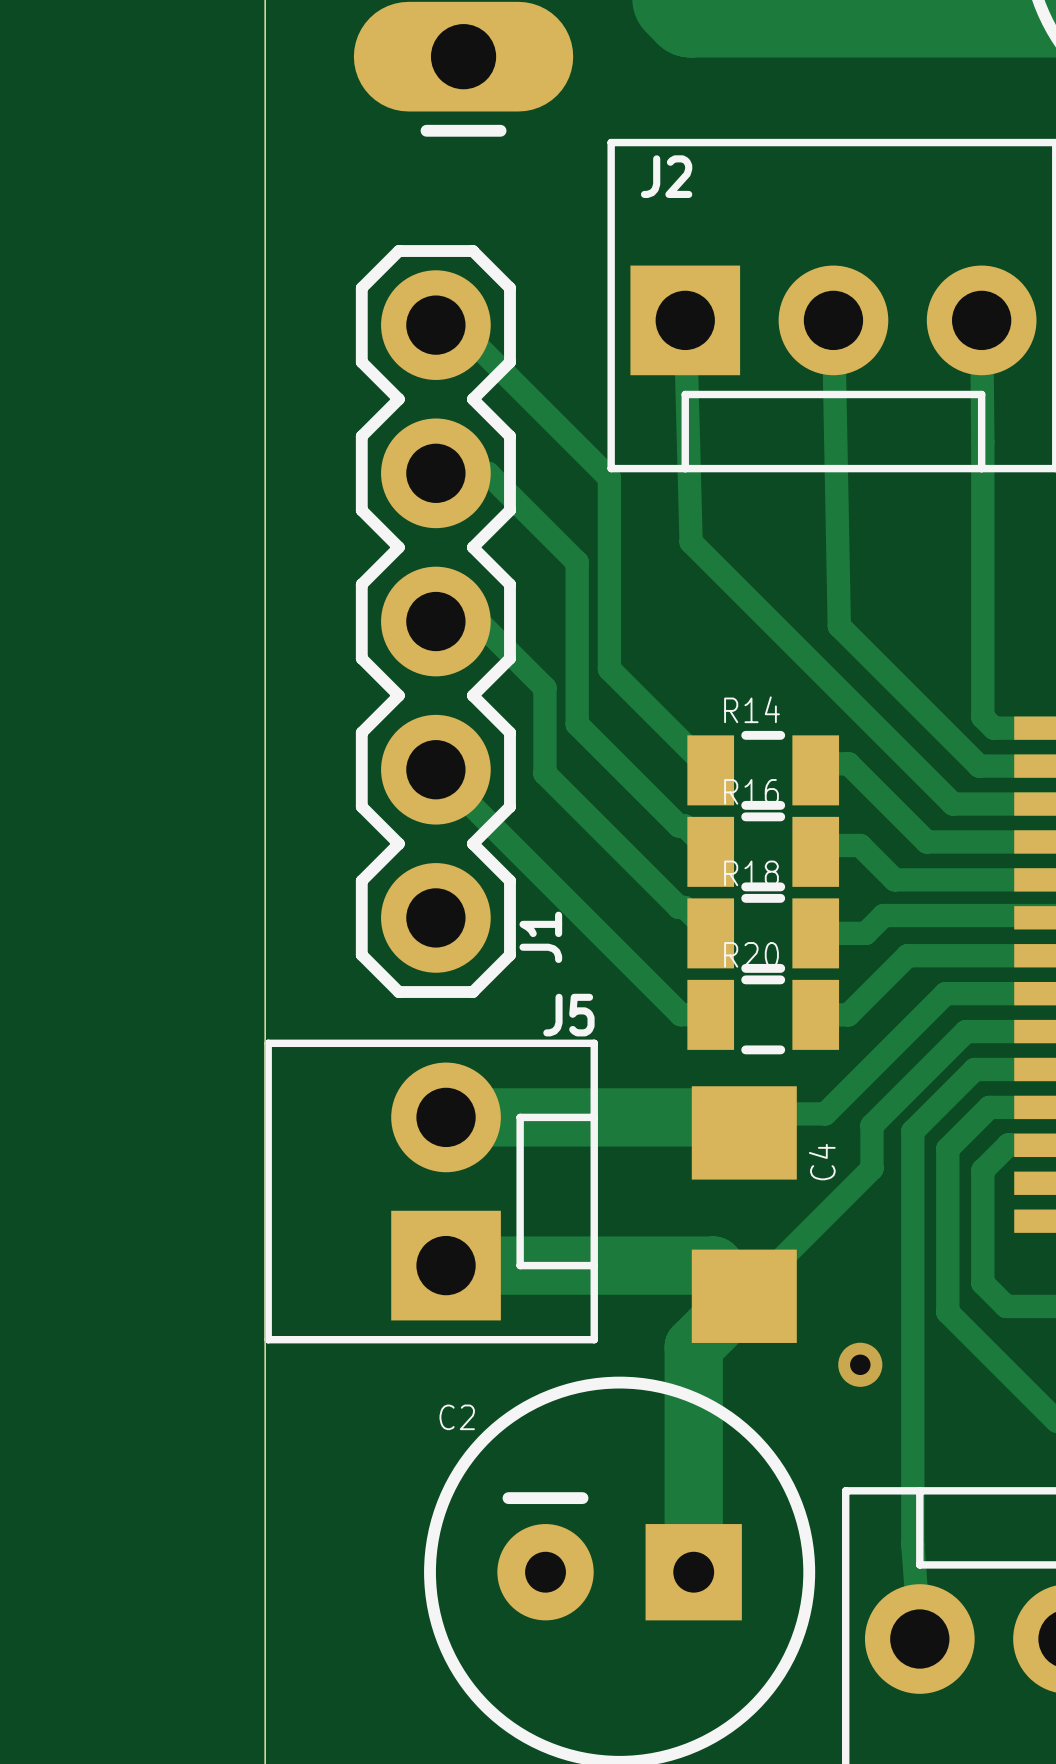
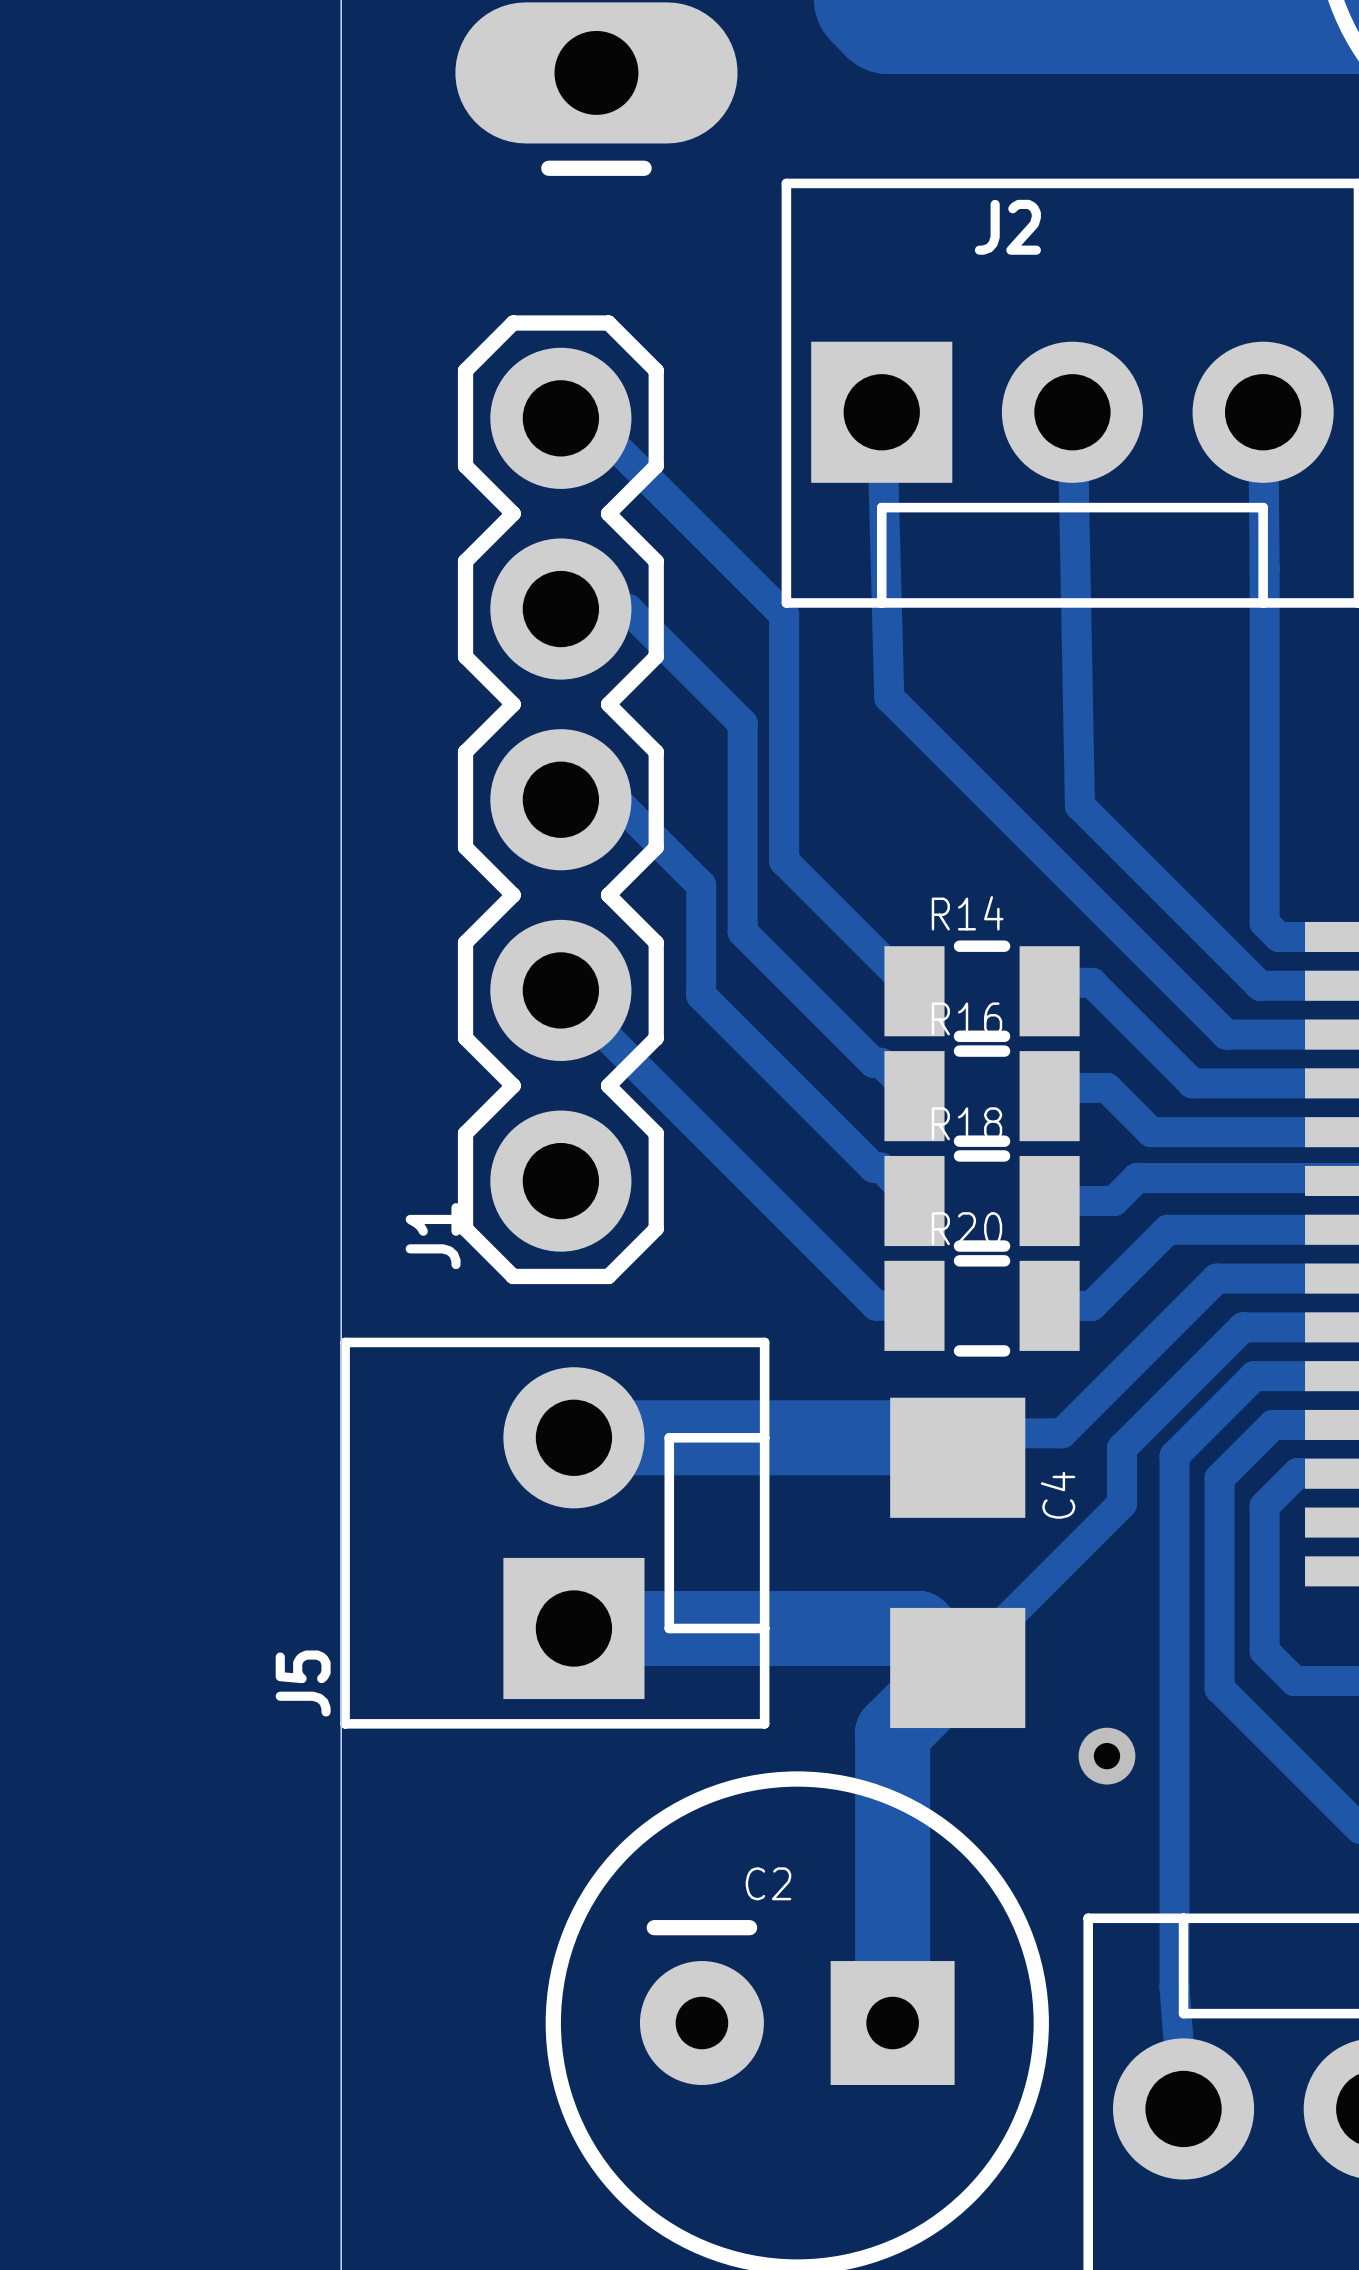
J2 name position: J2 (666, 176) -> J2 (1007, 227)
J1 name position: J1 (540, 937) -> J1 (433, 1236)
J5 name rotation: 0° (568, 1015) -> 90° counterclockwise (303, 1683)
J5 name position: J5 (568, 1015) -> J5 (303, 1683)
C2 name position: C2 (457, 1417) -> C2 (768, 1883)

